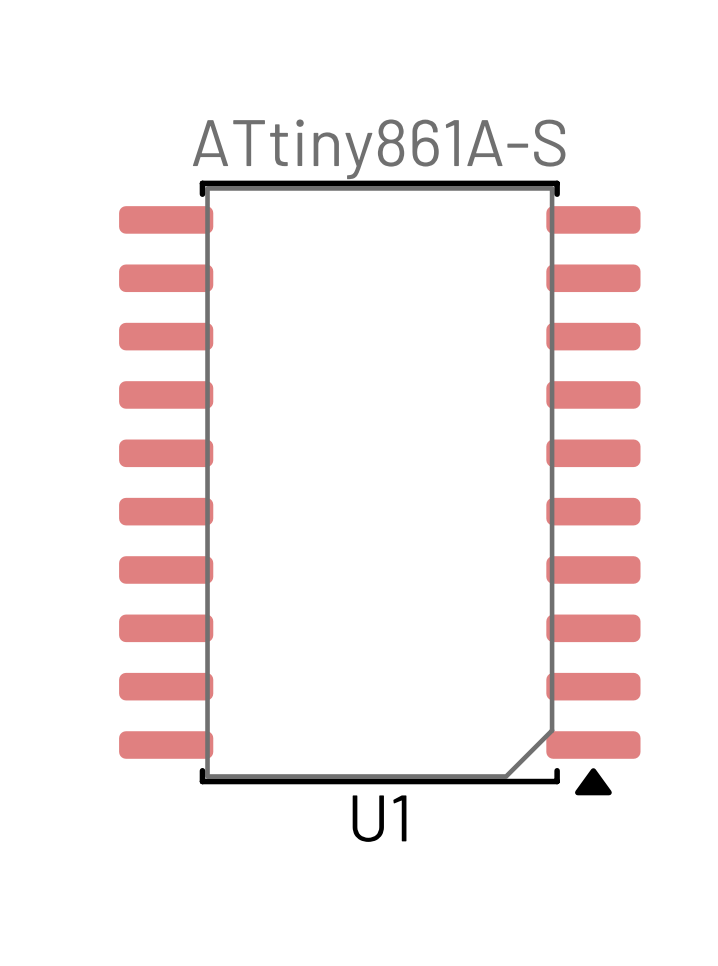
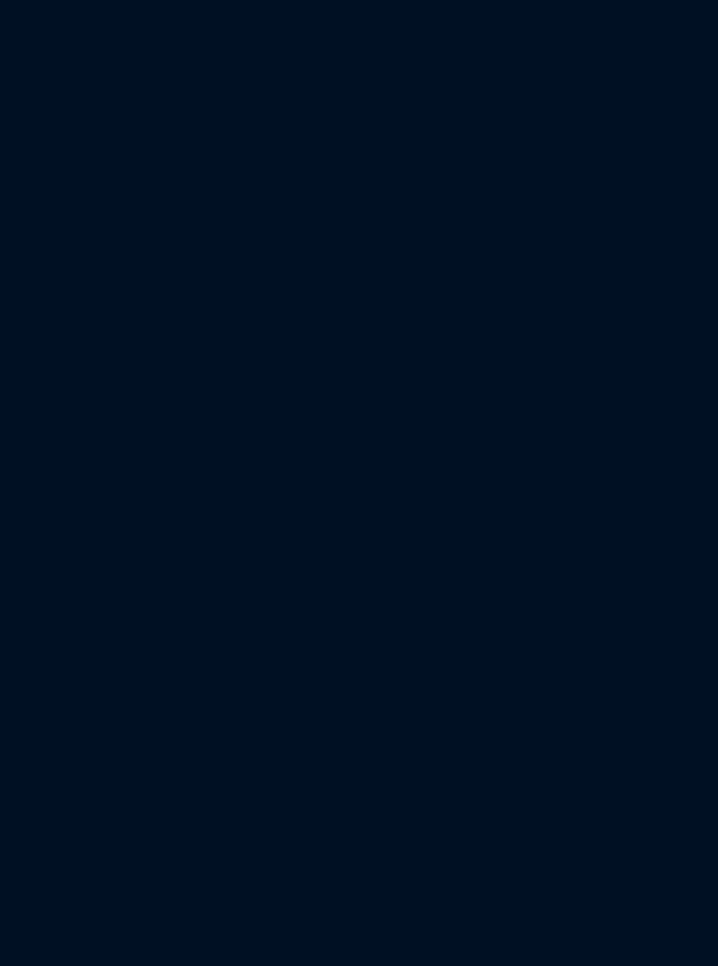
U1: ATtiny861A-S (379, 487) -> none

